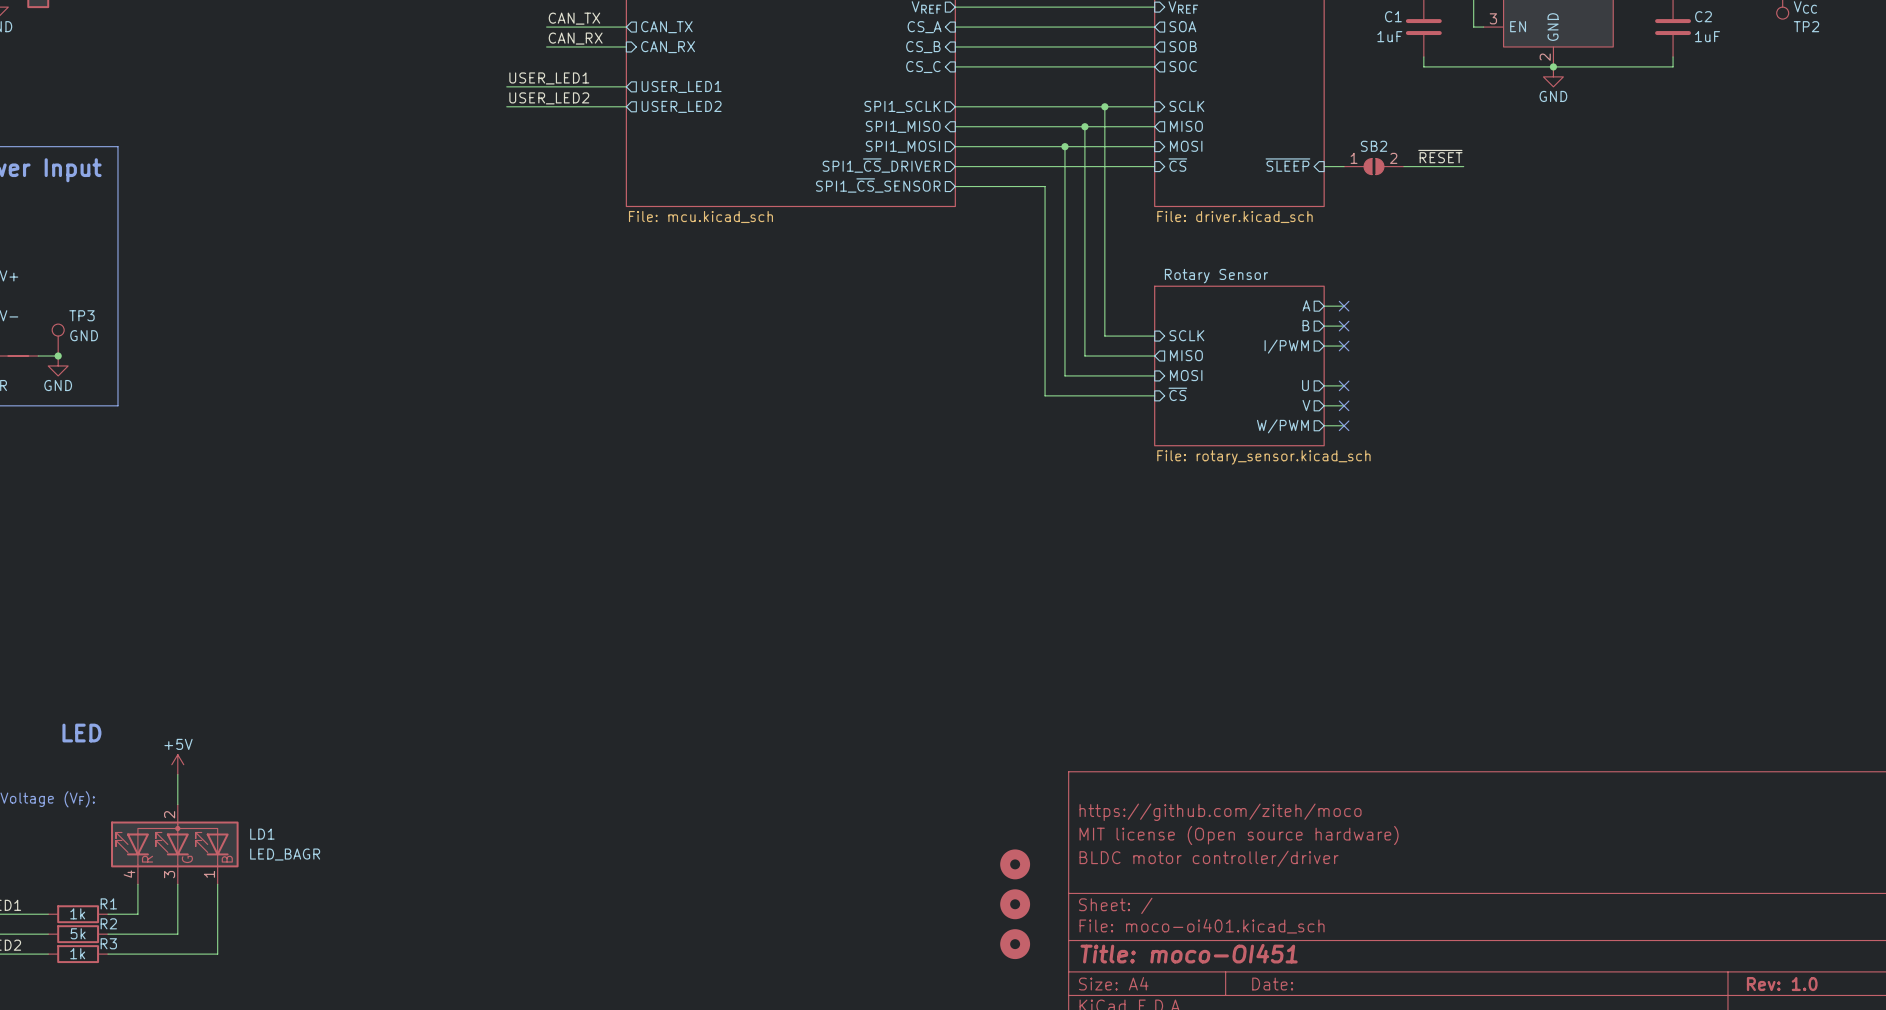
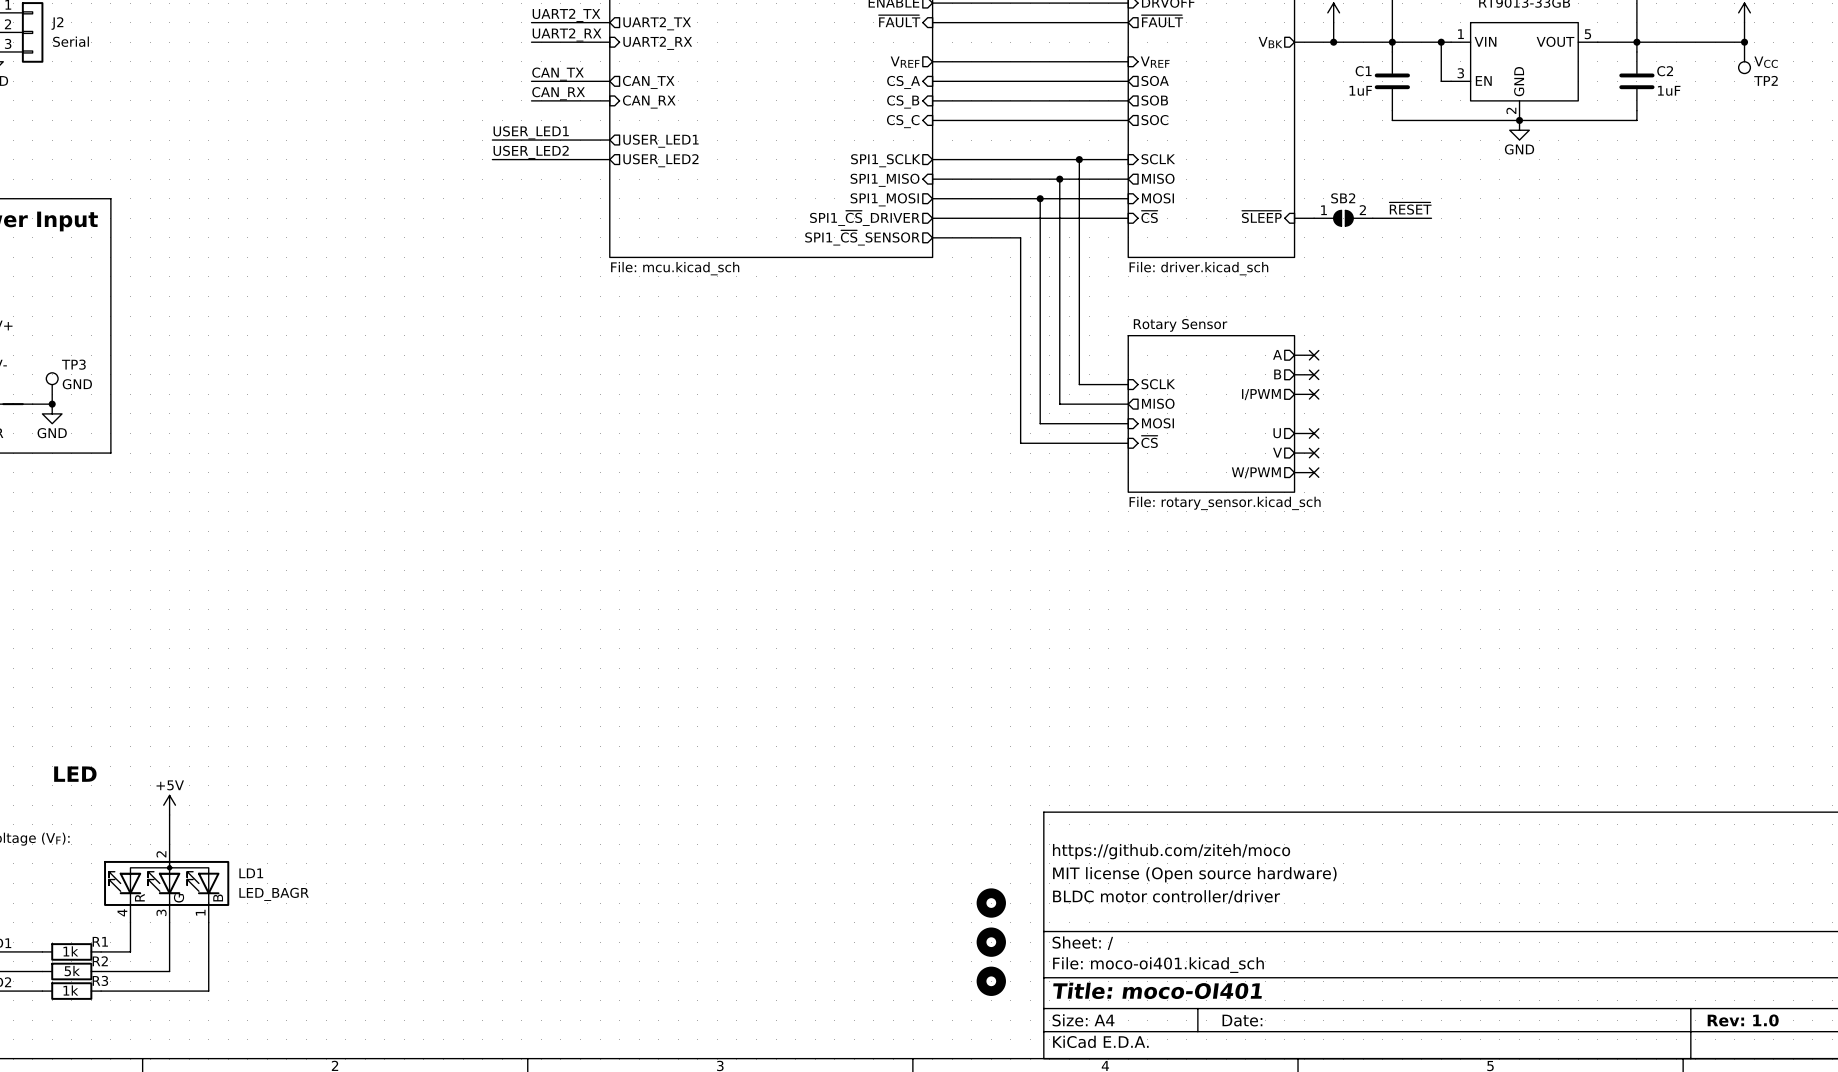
title block: Title: moco-OI451 (1189, 953) -> Title: moco-OI401 (1157, 990)

